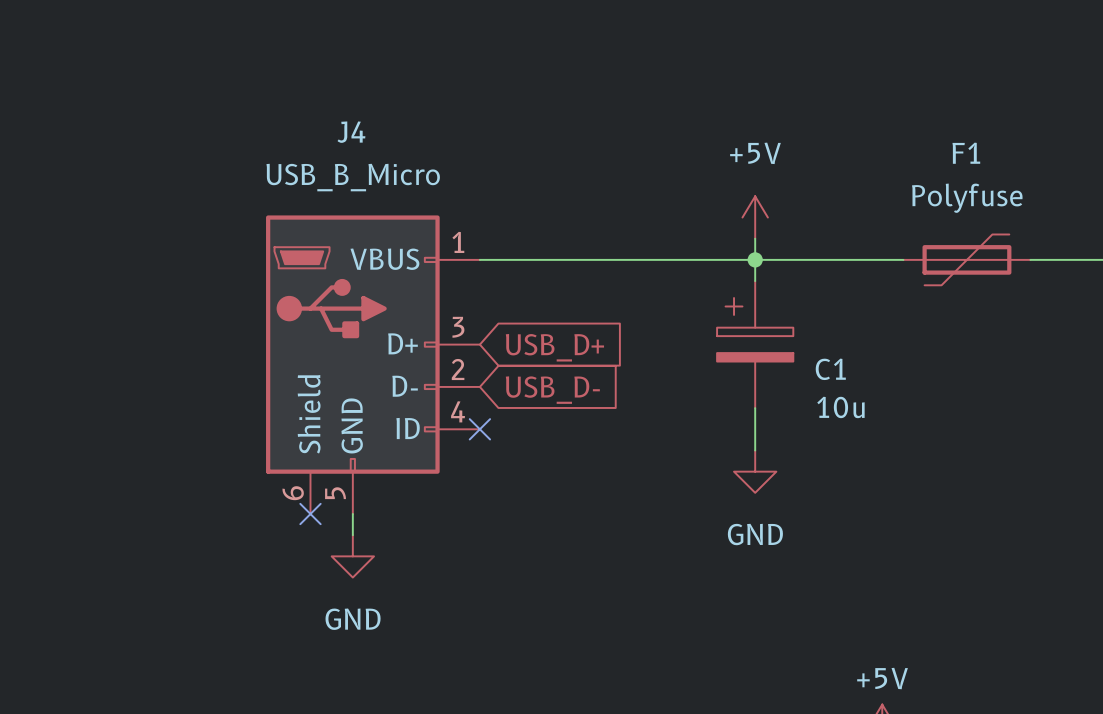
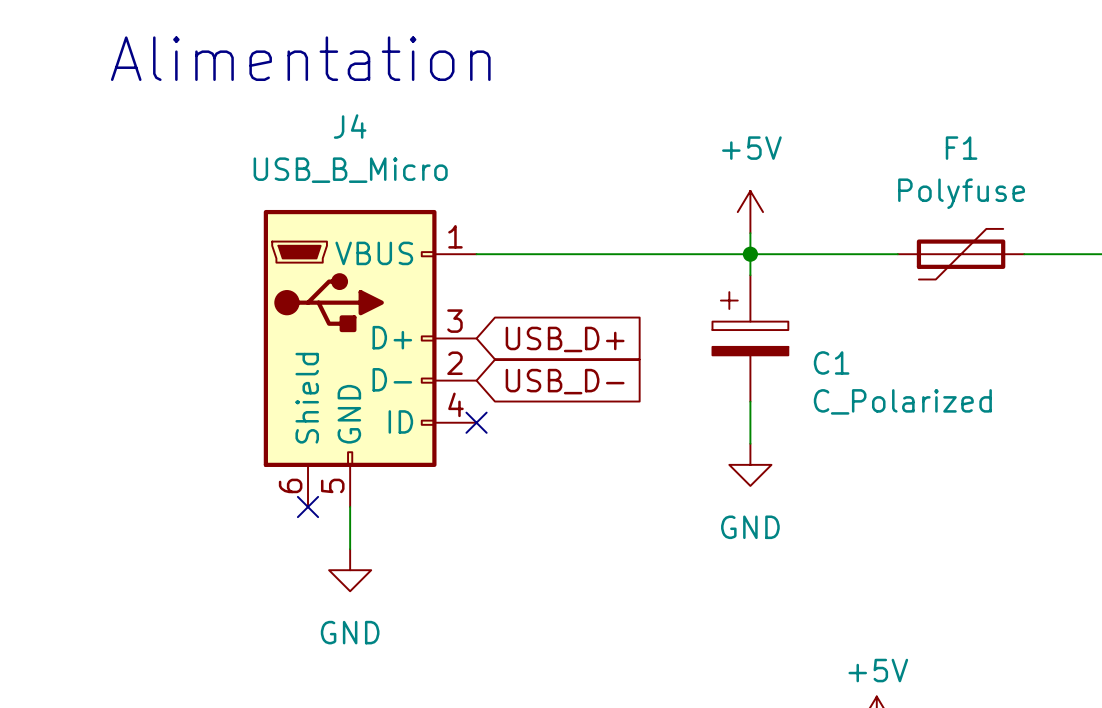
text: none -> Alimentation (300, 58)
C1 value: 10u (840, 407) -> C_Polarized (902, 401)
power symbol position: GND (352, 556) -> GND (350, 570)

